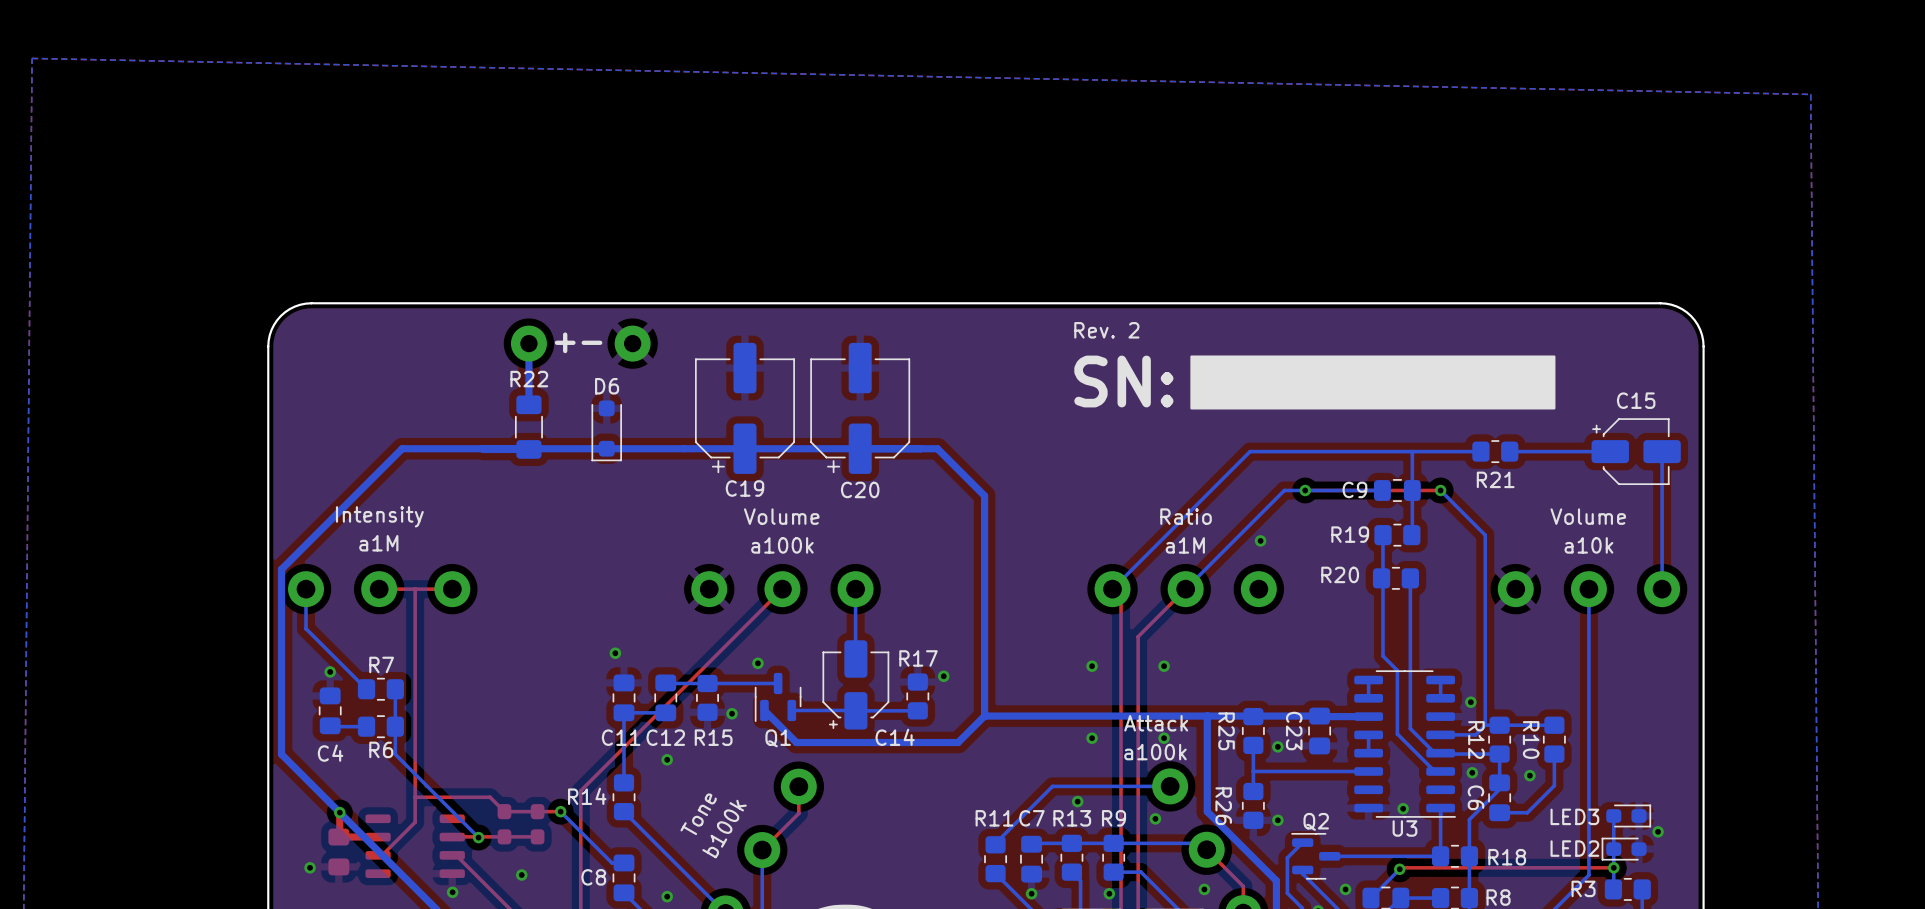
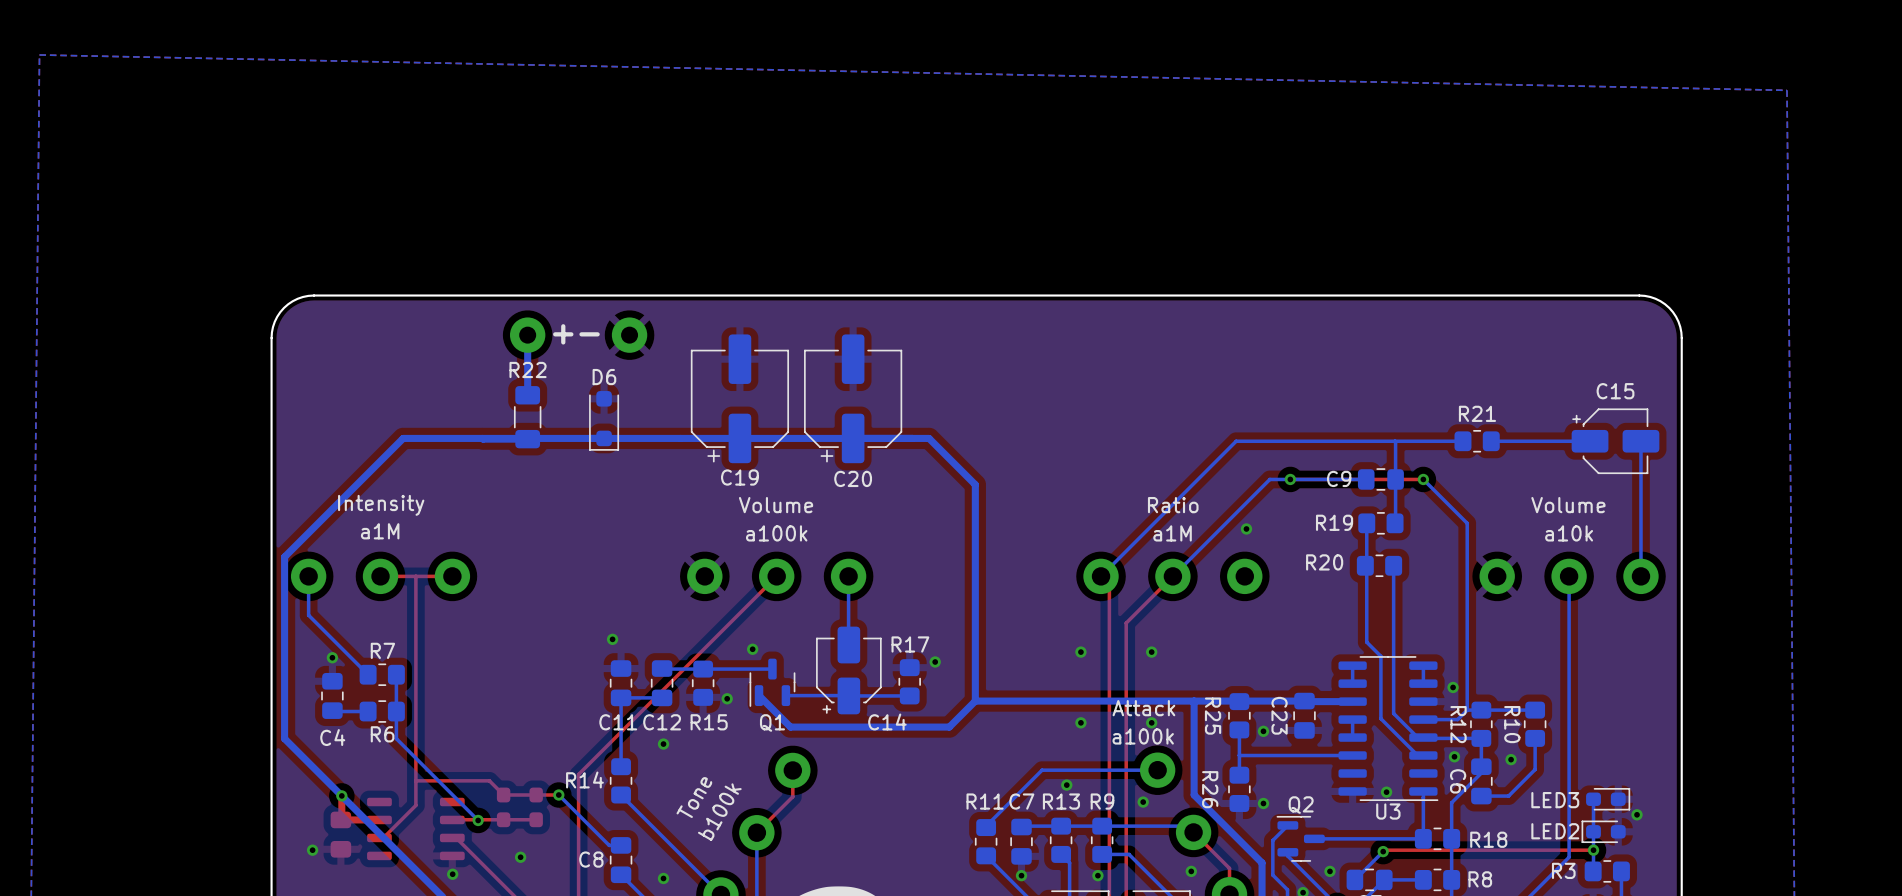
text: Rev. 2 (1106, 330) -> none
drawing: [1190, 355, 1556, 410] -> none
text: SN: (1123, 381) -> none
R21 name position: R21 (1495, 479) -> R21 (1477, 413)

